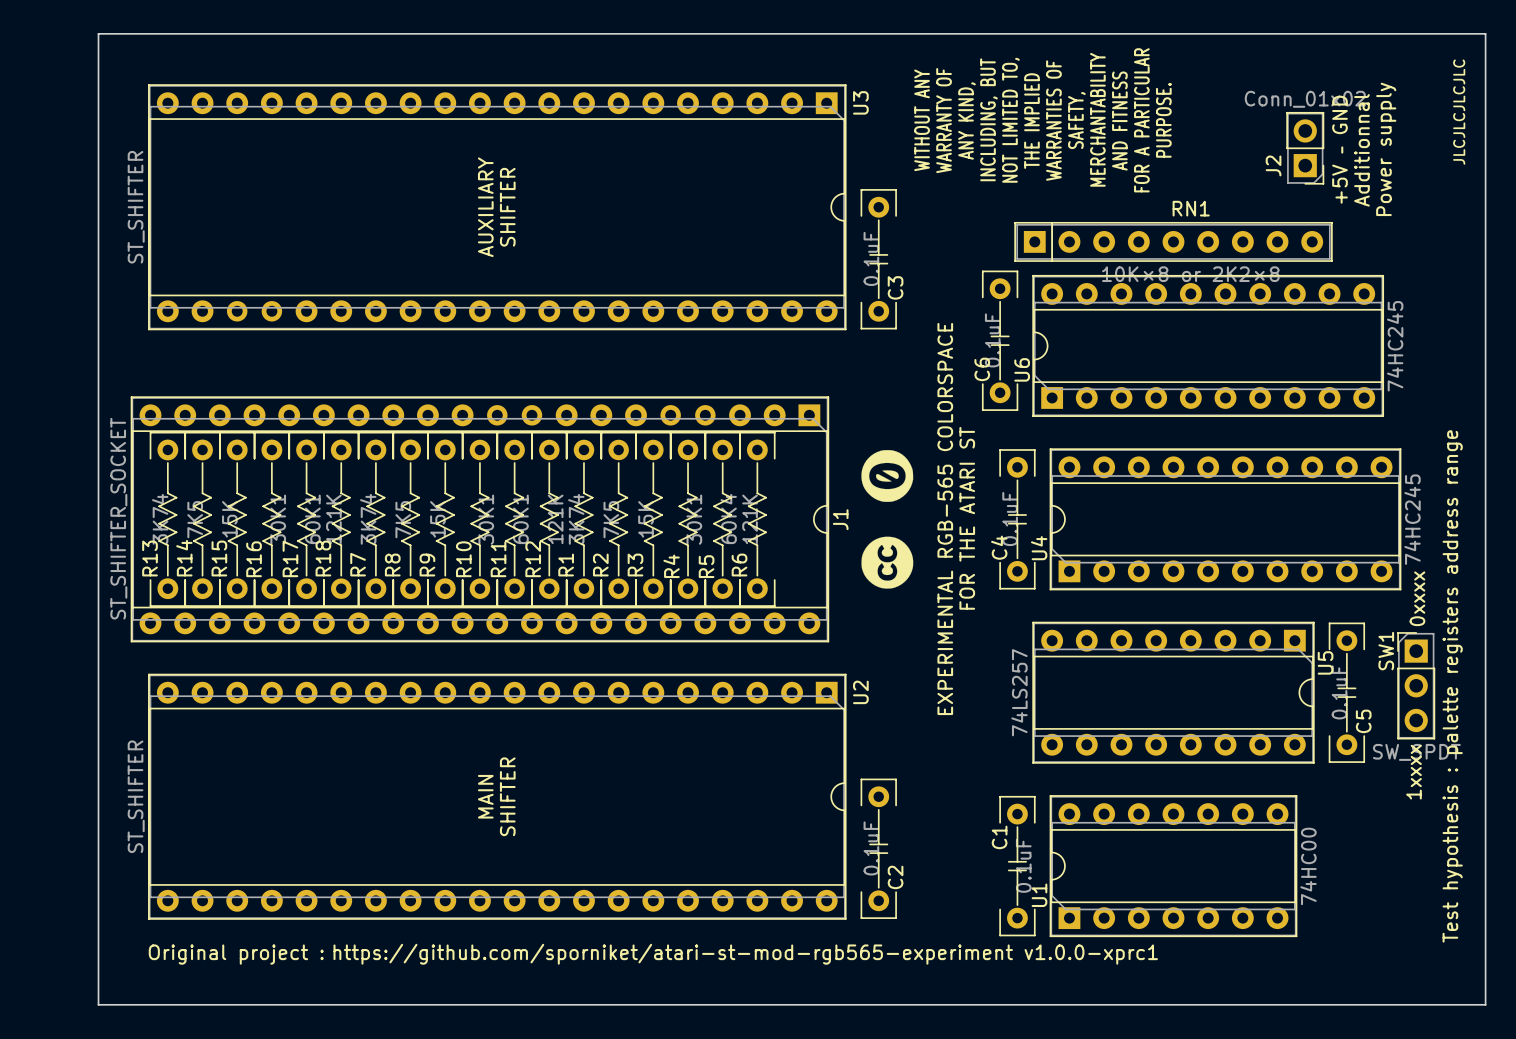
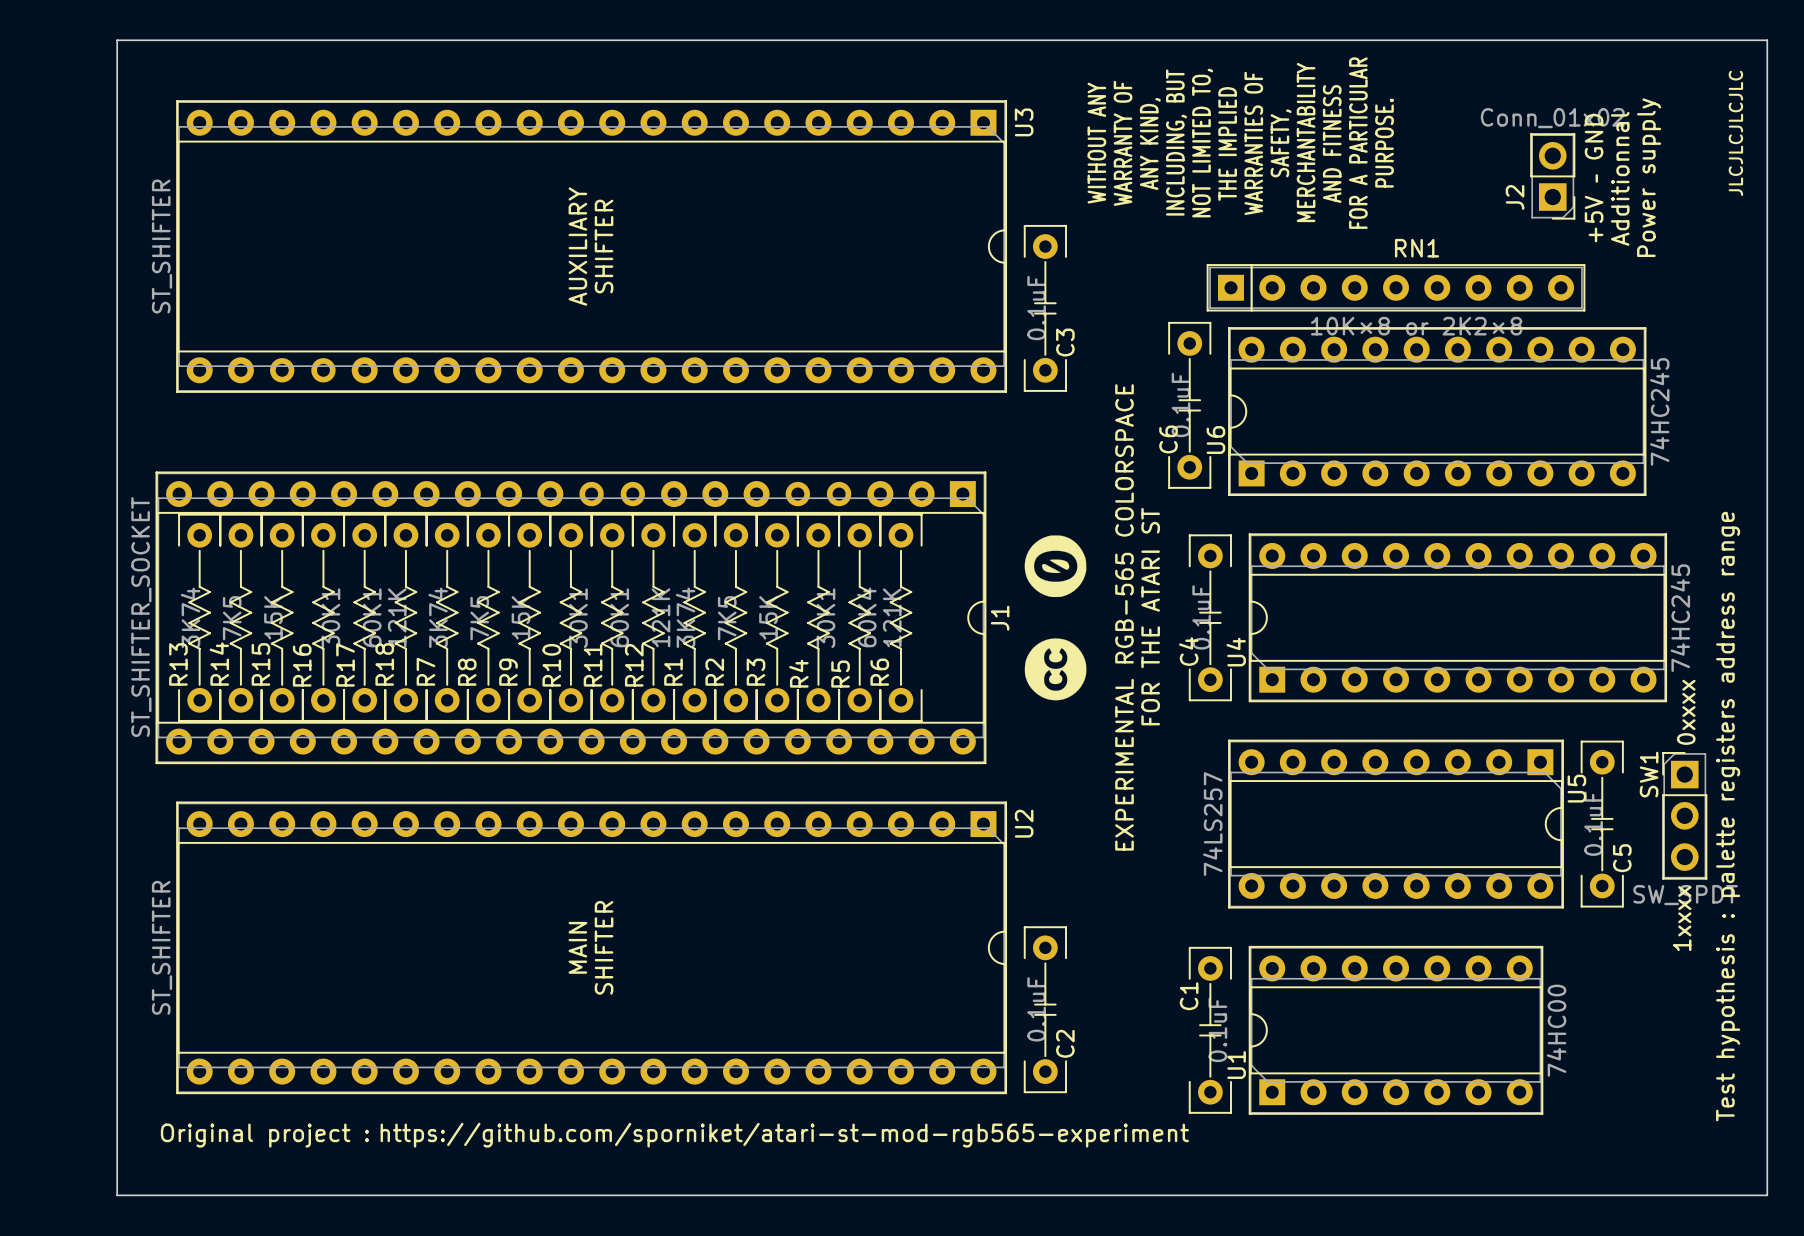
text: Original project : https://github.com/sporniket/atari-st-mod-rgb565-experiment v1.0.0-xprc1 (653, 954) -> Original project : https://github.com/sporniket/atari-st-mod-rgb565-experiment (674, 1135)

